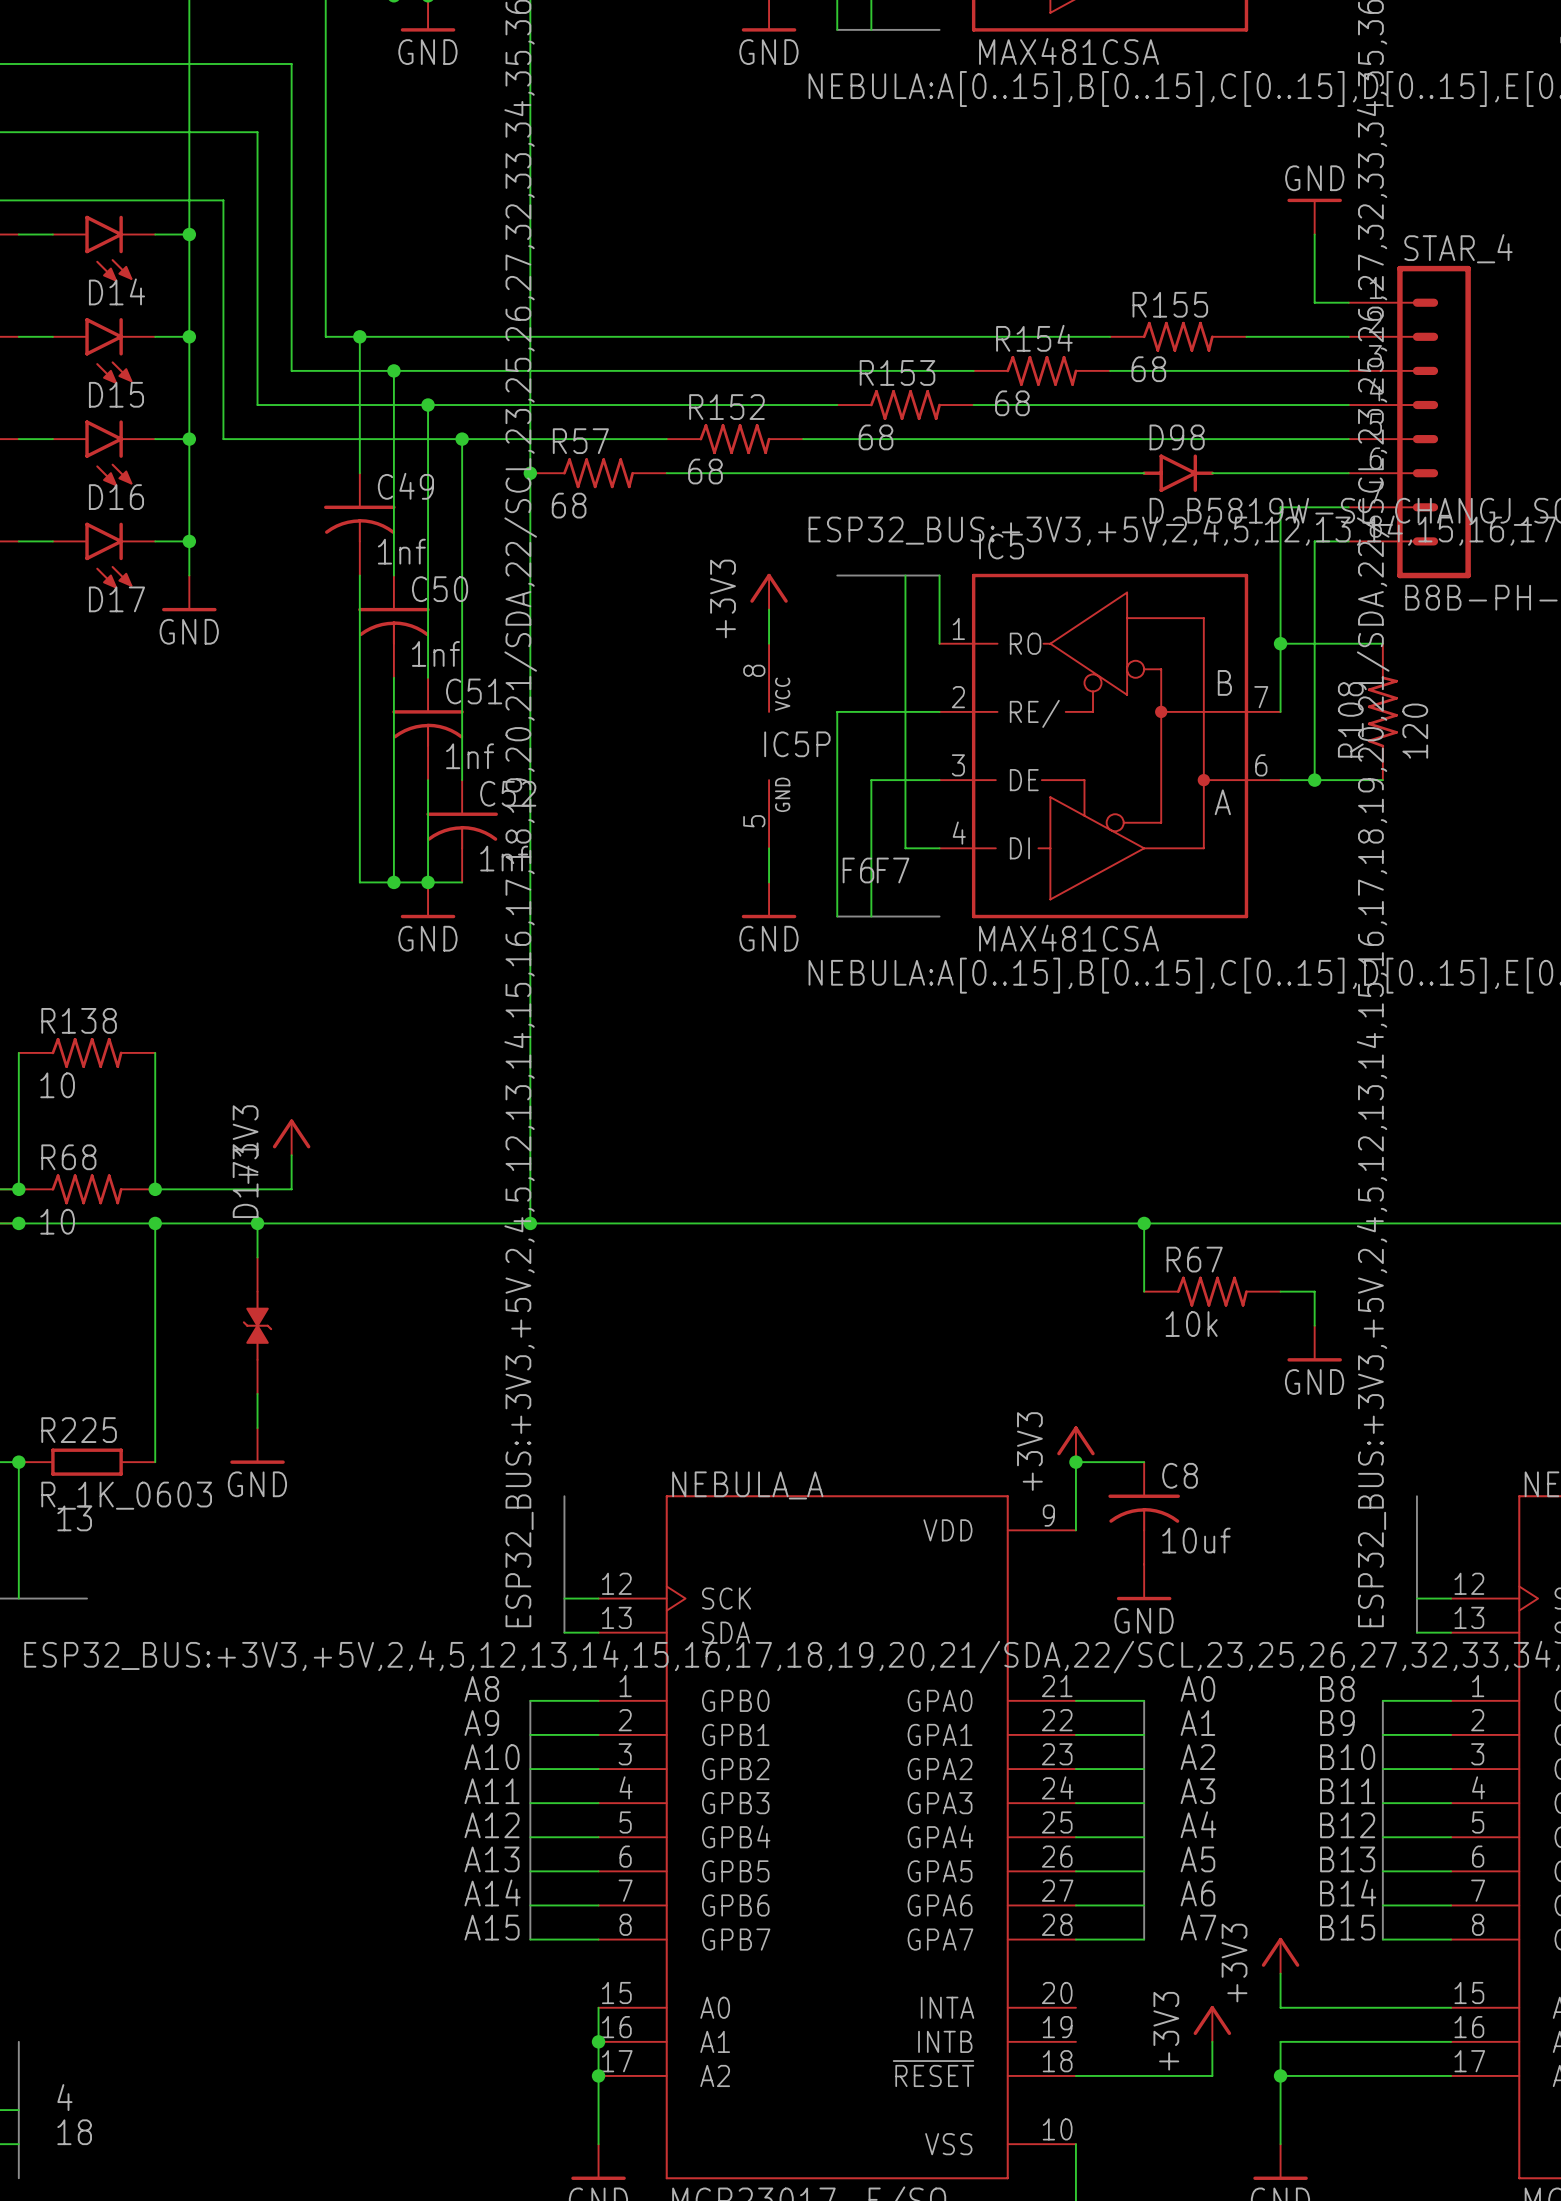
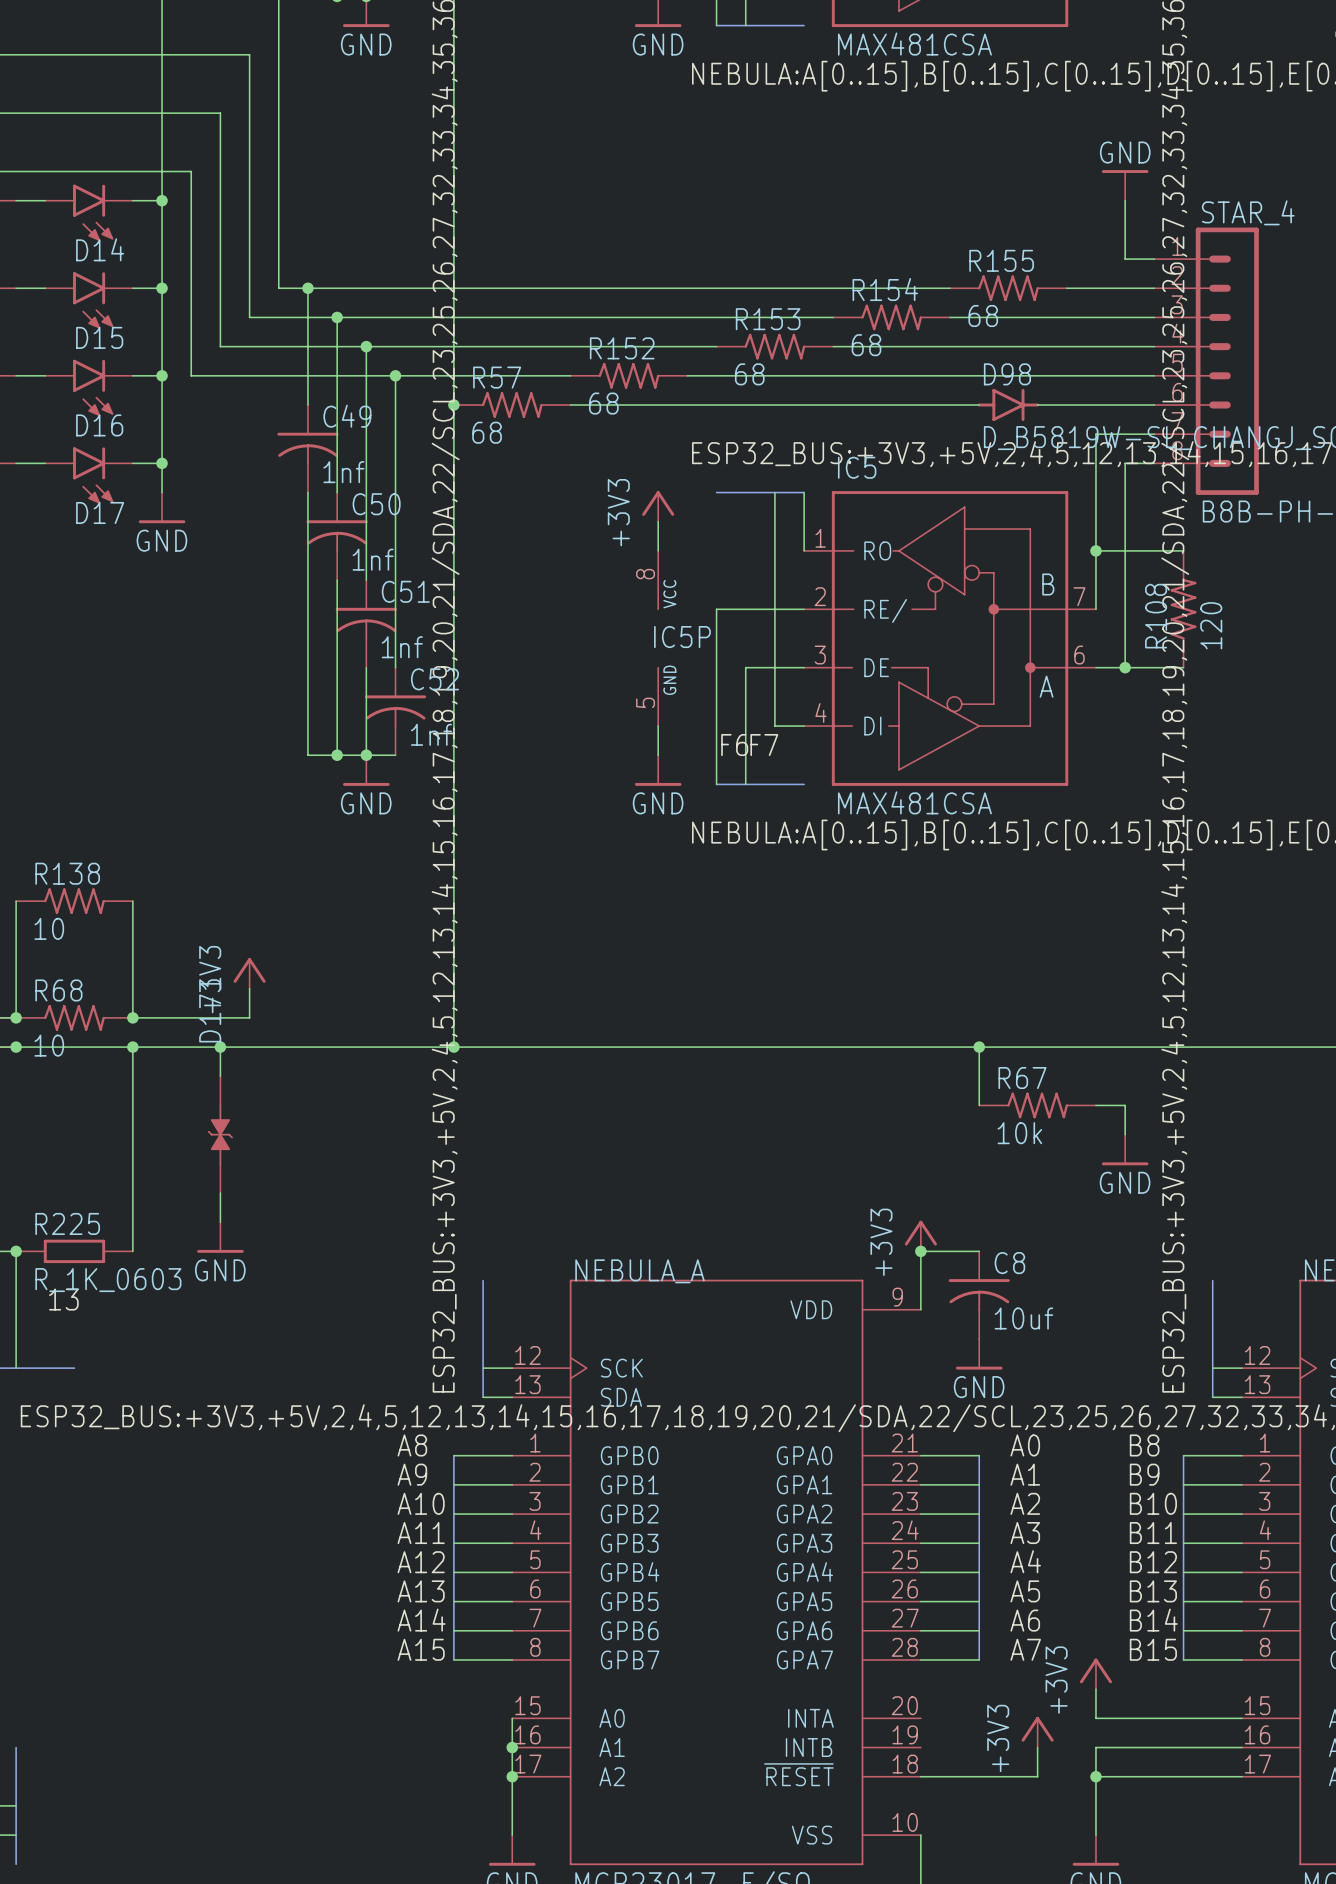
label: 4 (64, 2097) -> none
label: 18 (74, 2132) -> none

